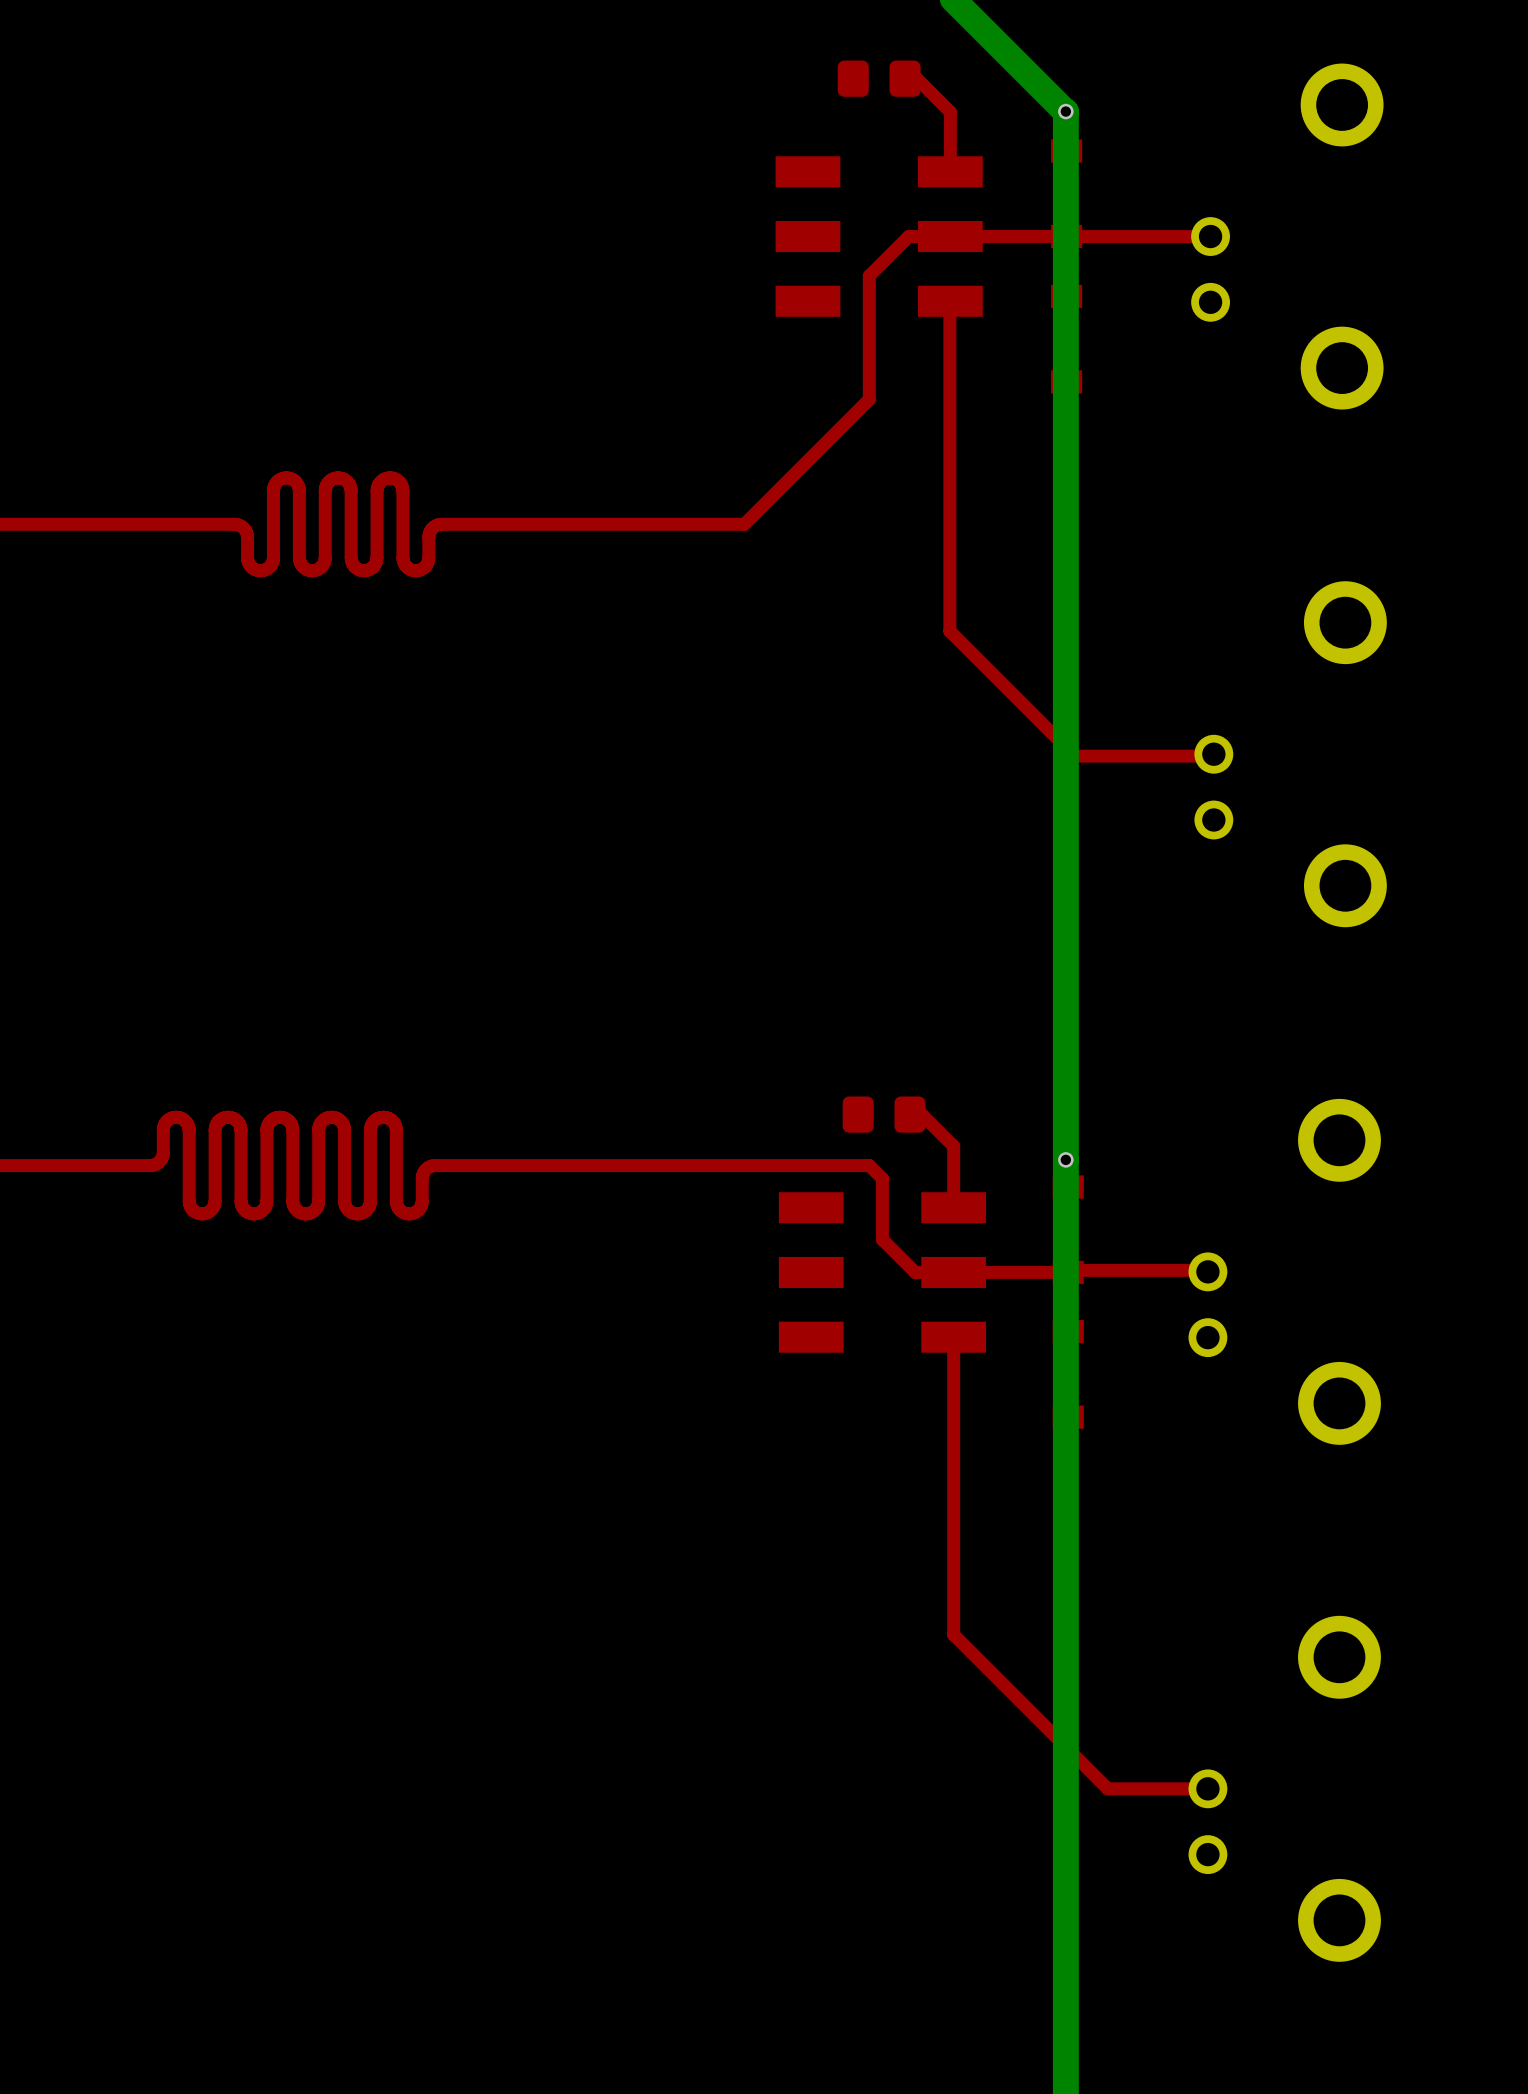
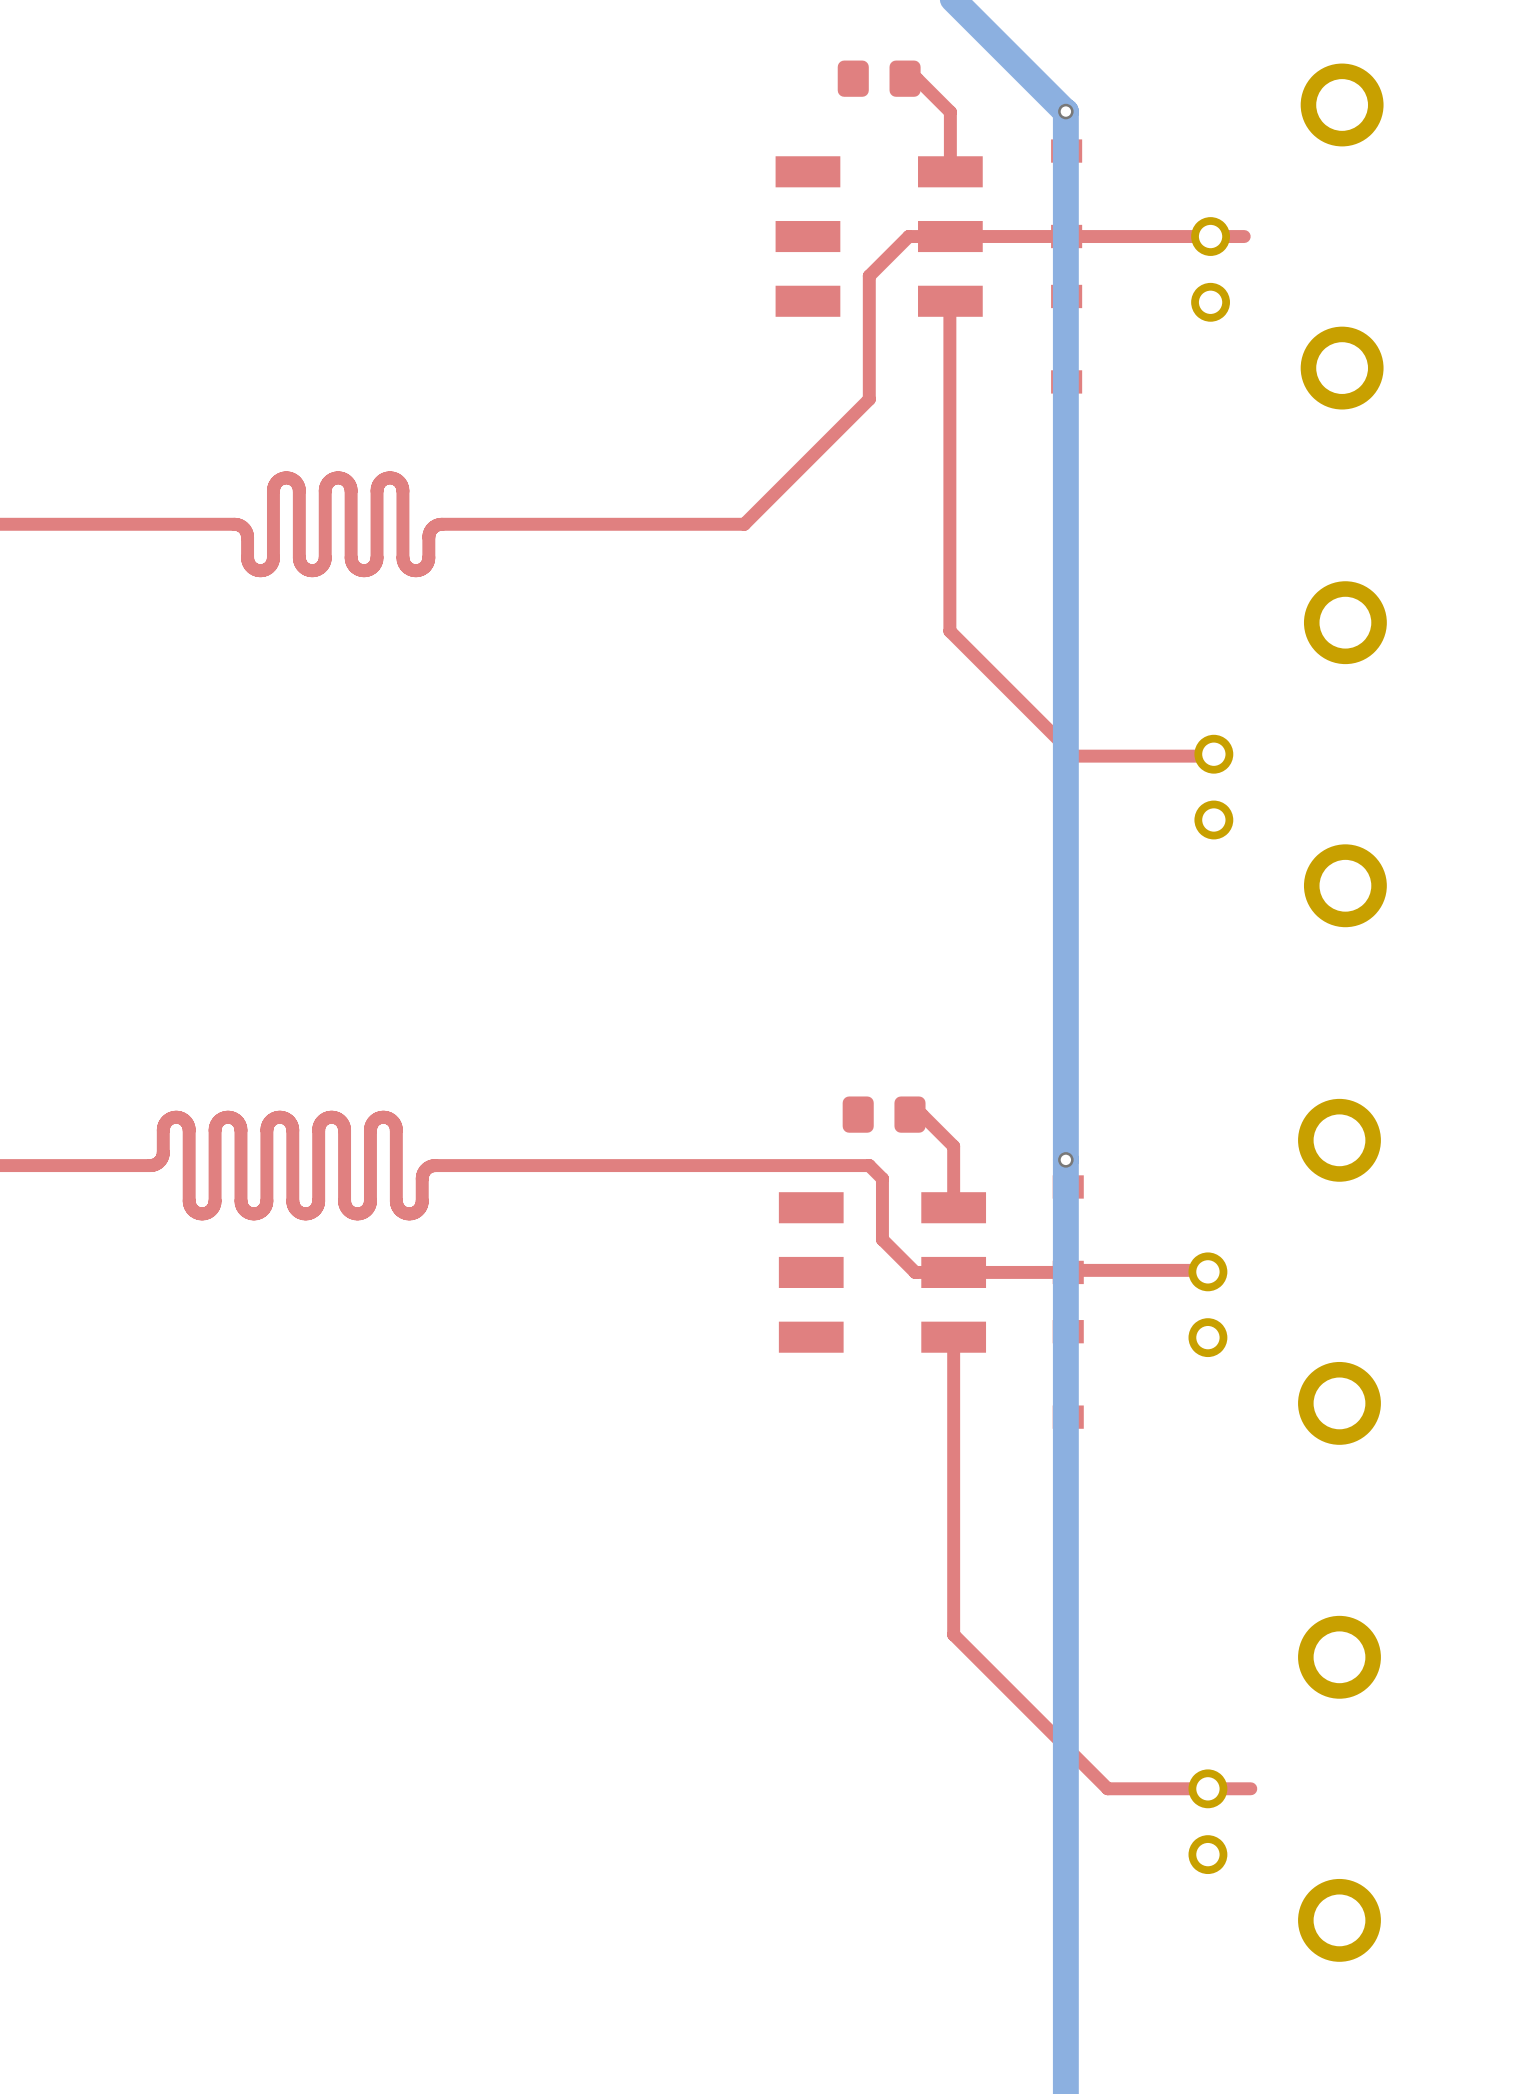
top track: none -> (1244, 236) (1207, 236)
top track: none -> (1250, 1788) (1207, 1788)

